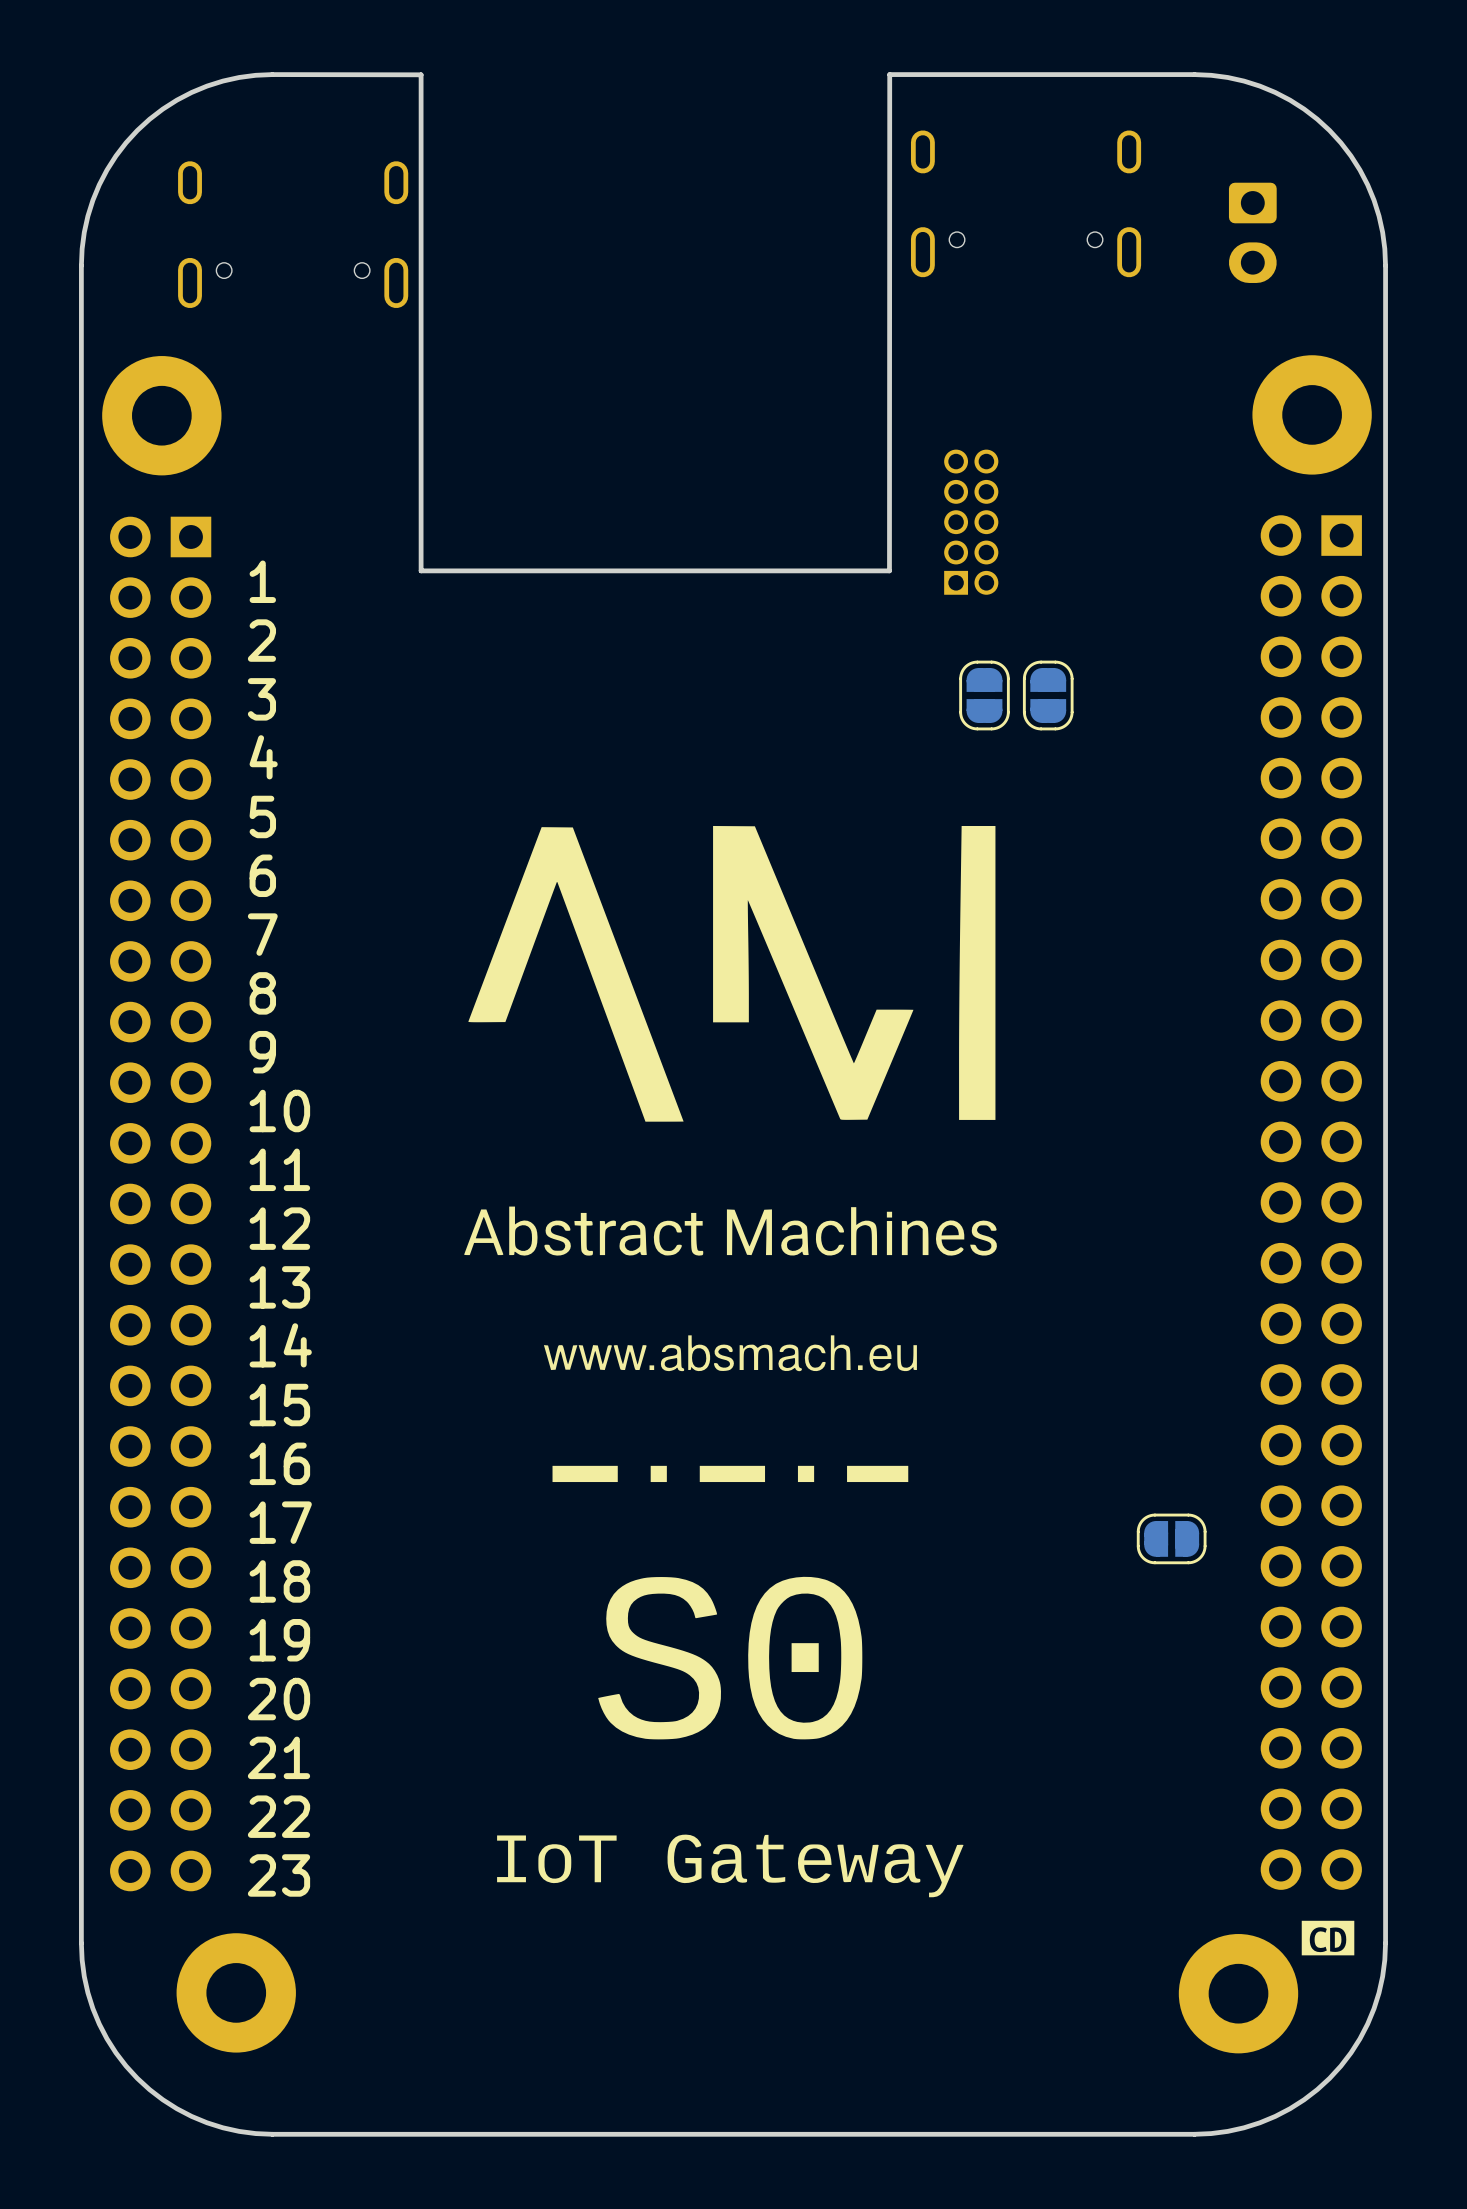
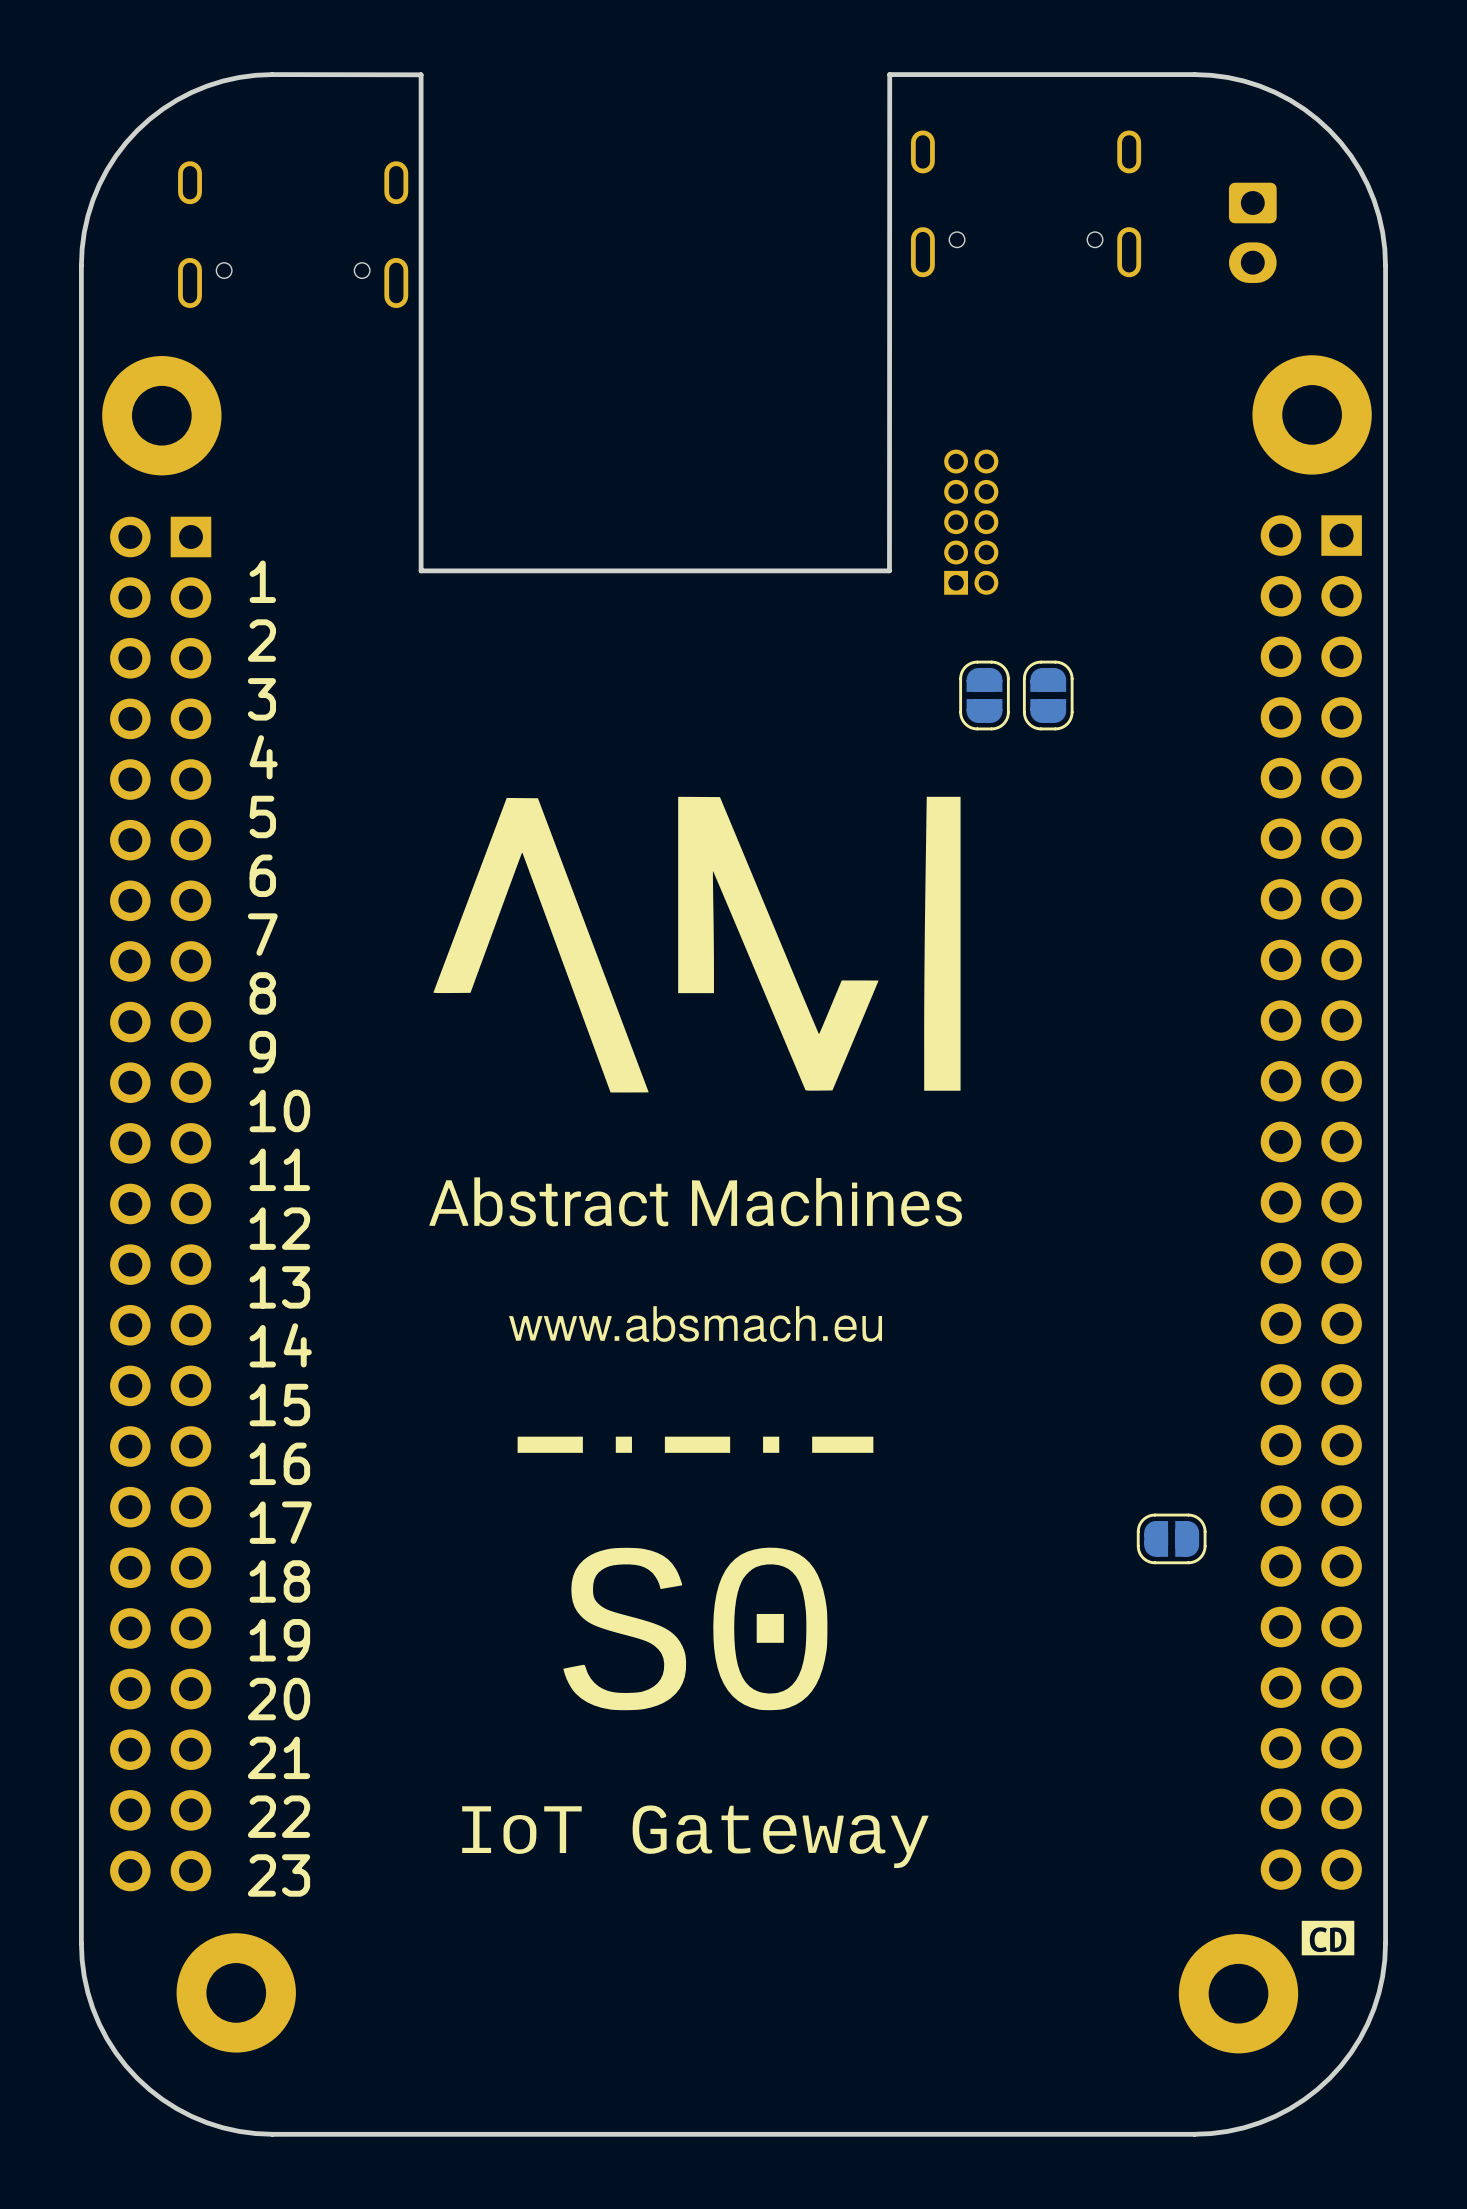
drawing position: (730, 1361) -> (695, 1332)

